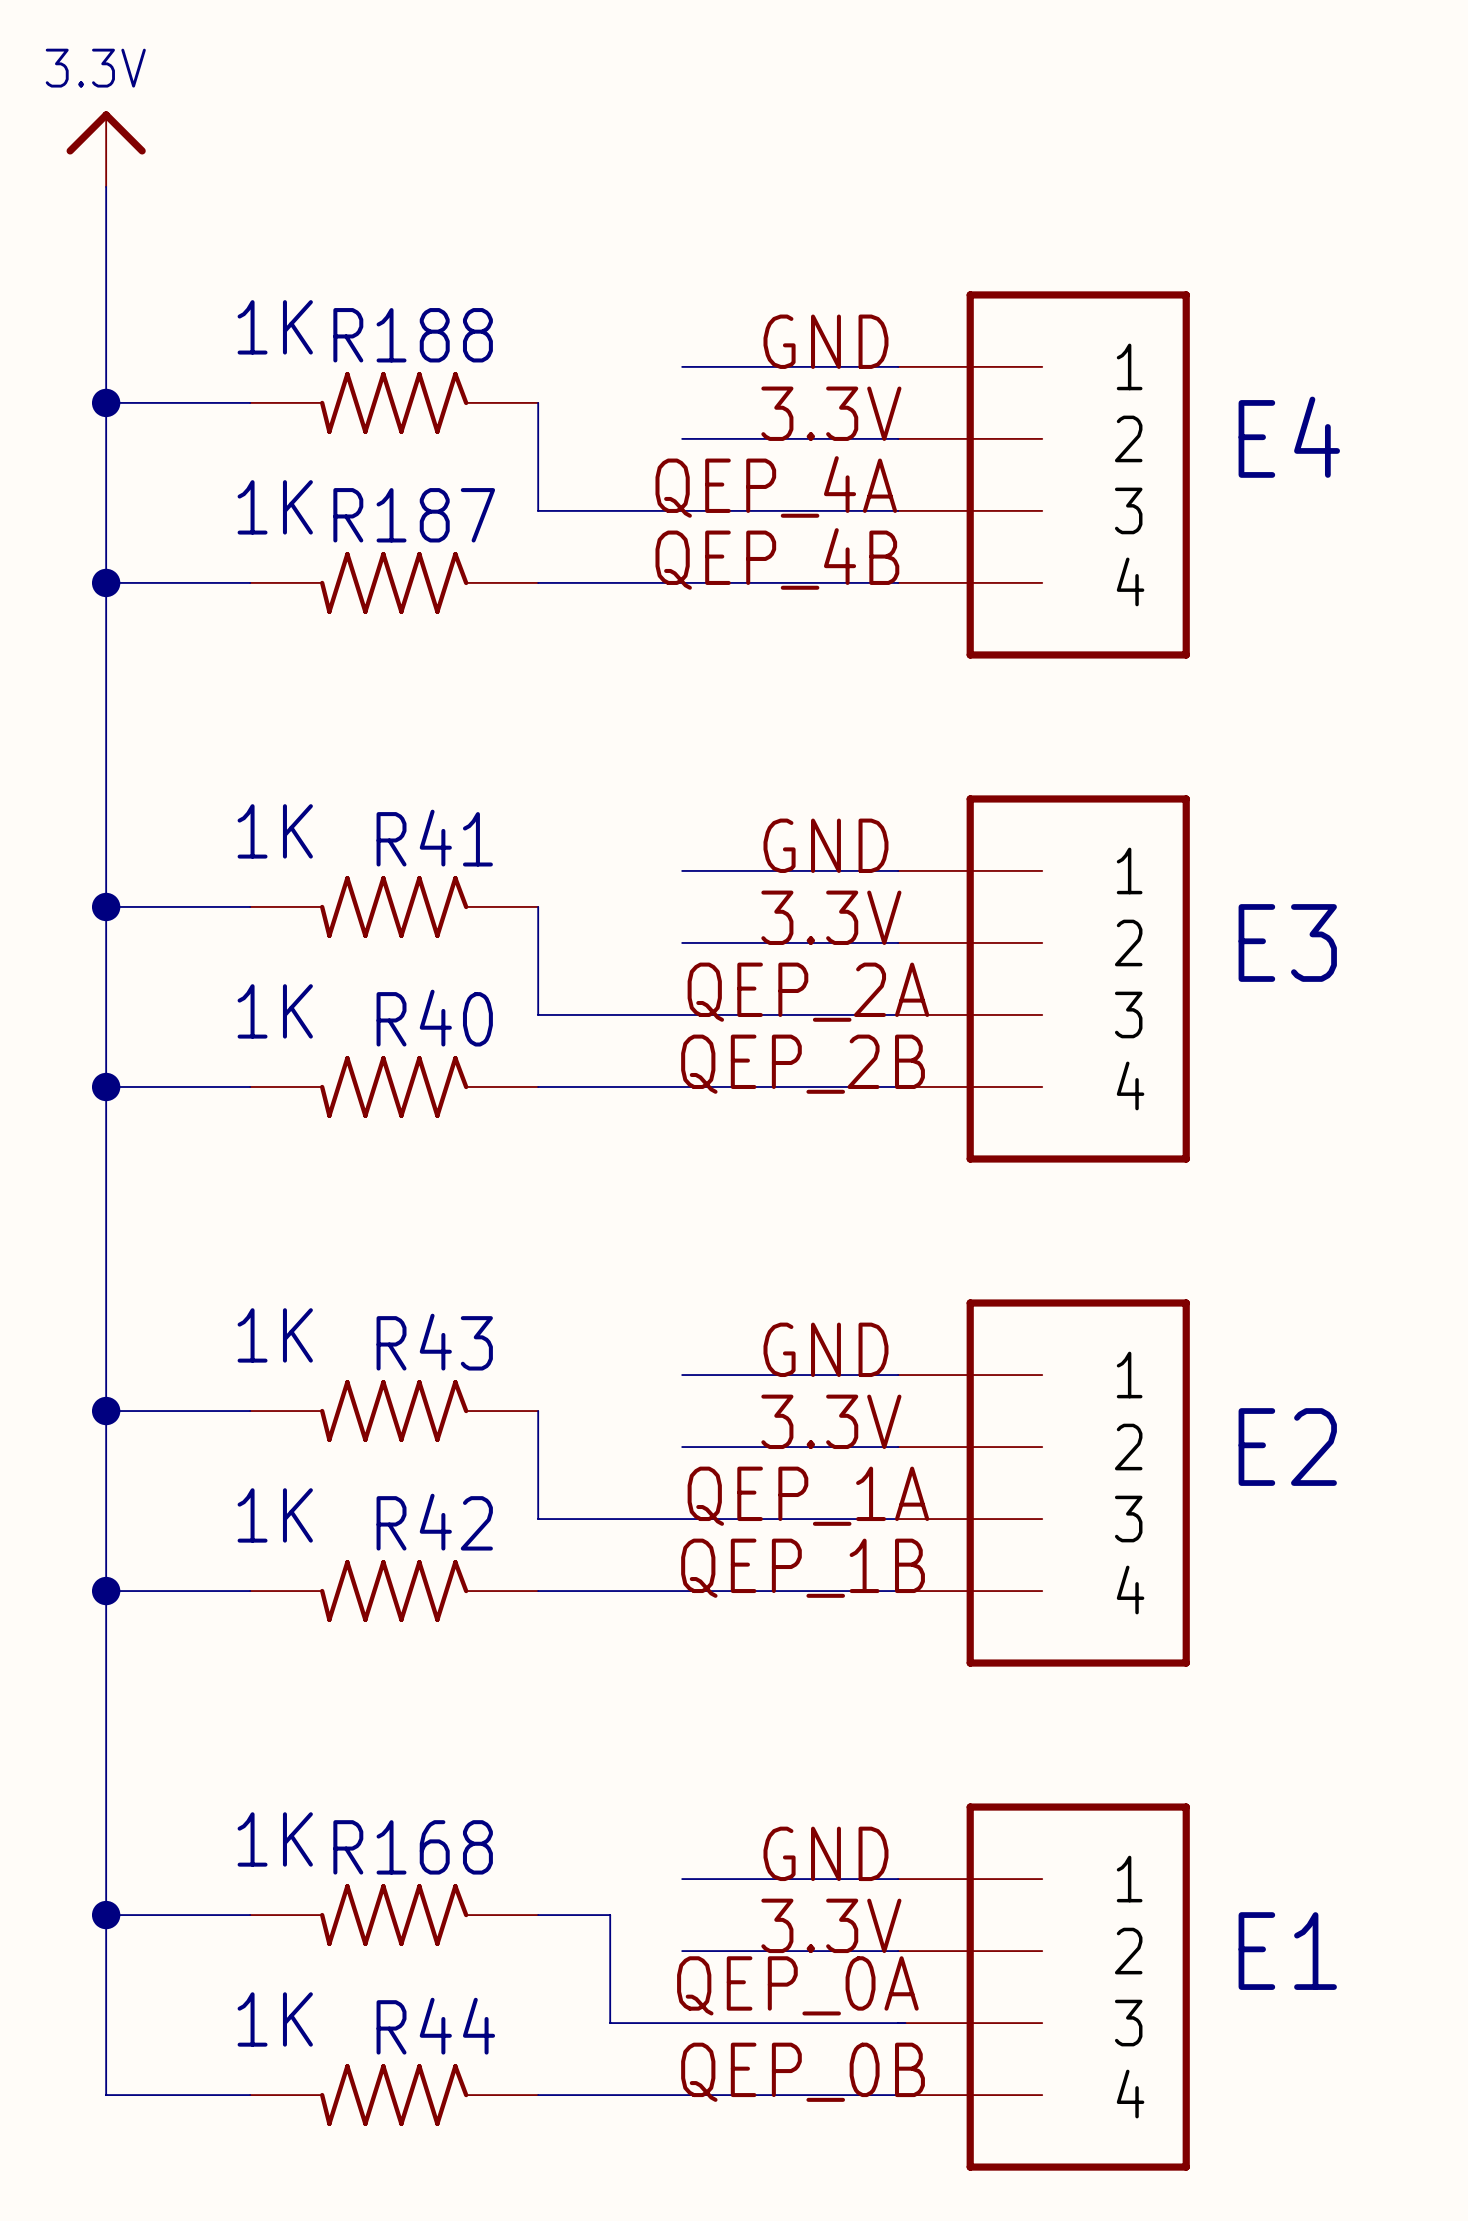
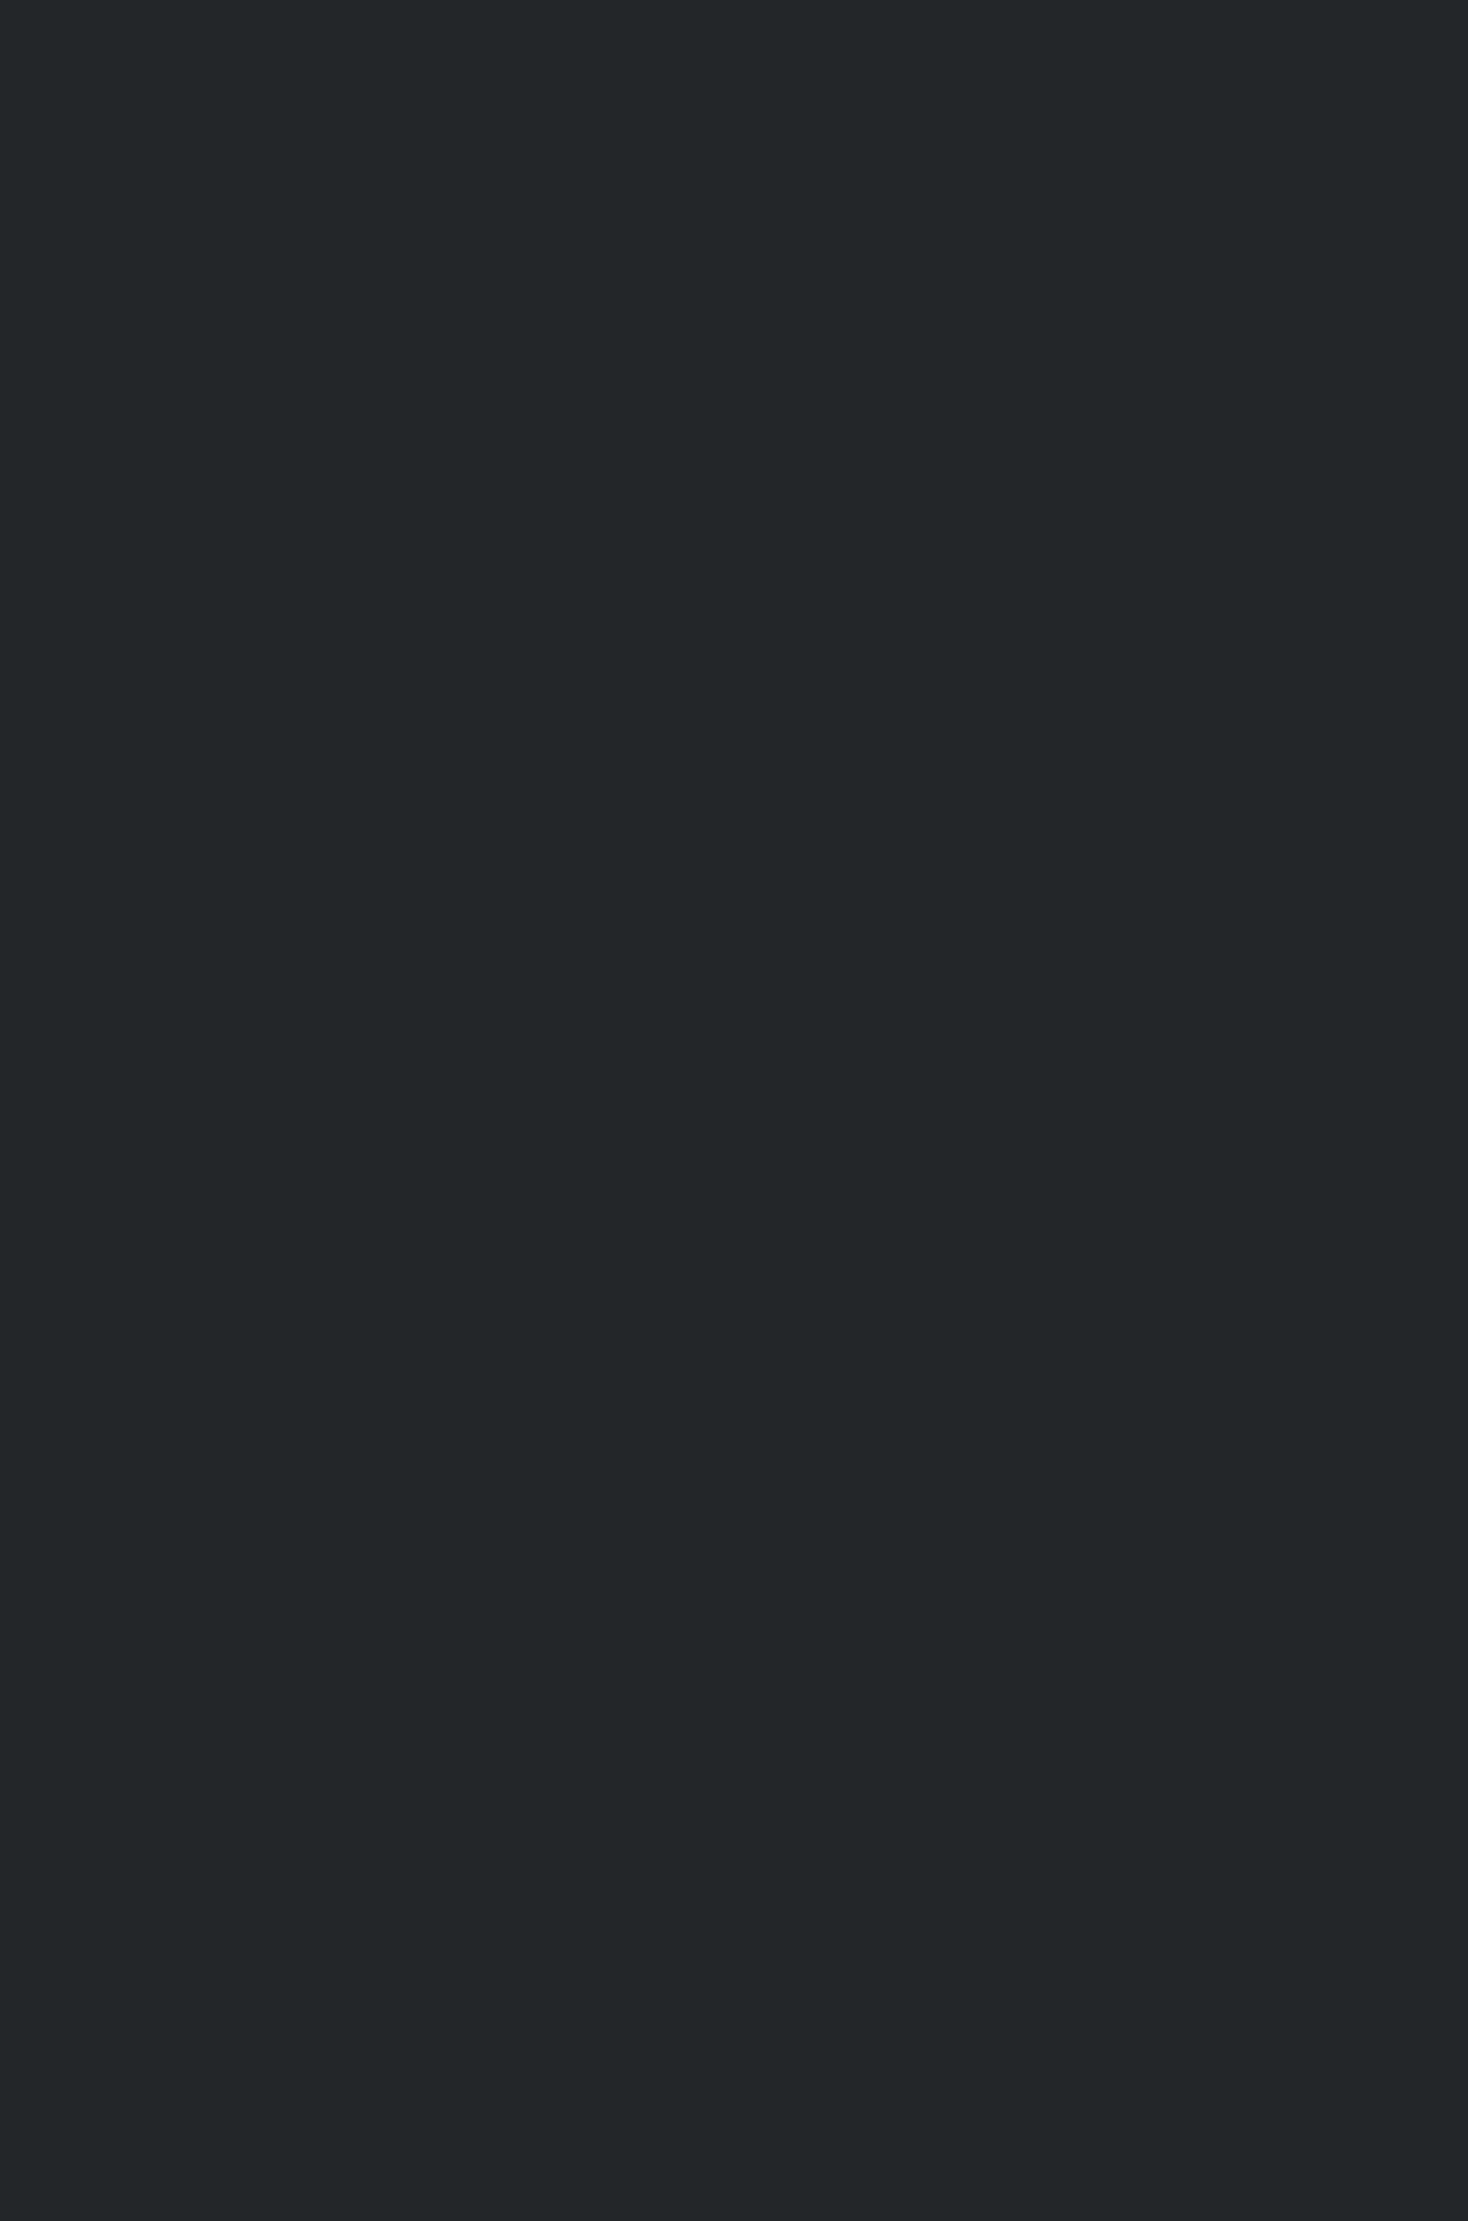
power symbol: 3.3V (106, 149) -> none
wire: (106, 186) (106, 2095) (250, 2095) -> none
label: GND (825, 341) -> none
wire: (682, 366) (898, 366) -> none
wire: (106, 402) (250, 402) -> none
junction: (106, 402) -> none
R188: 1K (394, 402) -> none
wire: (538, 402) (538, 510) (898, 510) -> none
label: 3.3V (831, 413) -> none
wire: (682, 438) (898, 438) -> none
E4: (1044, 474) -> none
label: QEP_4A (776, 486) -> none
label: QEP_4B (777, 558) -> none
wire: (106, 582) (250, 582) -> none
junction: (106, 582) -> none
R187: 1K (394, 582) -> none
wire: (538, 582) (898, 582) -> none
label: GND (825, 845) -> none
wire: (682, 870) (898, 870) -> none
wire: (106, 906) (250, 906) -> none
junction: (106, 906) -> none
R41: 1K (394, 906) -> none
wire: (538, 906) (538, 1014) (898, 1014) -> none
label: 3.3V (831, 917) -> none
wire: (682, 942) (898, 942) -> none
E3: (1044, 978) -> none
label: QEP_2A (808, 992) -> none
label: QEP_2B (803, 1064) -> none
wire: (106, 1086) (250, 1086) -> none
junction: (106, 1086) -> none
R40: 1K (394, 1086) -> none
wire: (538, 1086) (898, 1086) -> none
label: GND (825, 1349) -> none
wire: (682, 1375) (898, 1375) -> none
wire: (106, 1411) (250, 1411) -> none
junction: (106, 1411) -> none
R43: 1K (394, 1411) -> none
wire: (538, 1411) (538, 1519) (898, 1519) -> none
label: 3.3V (831, 1421) -> none
wire: (682, 1447) (898, 1447) -> none
E2: (1044, 1483) -> none
label: QEP_1A (808, 1496) -> none
label: QEP_1B (803, 1568) -> none
wire: (106, 1591) (250, 1591) -> none
junction: (106, 1591) -> none
R42: 1K (394, 1591) -> none
wire: (538, 1591) (898, 1591) -> none
label: GND (825, 1853) -> none
wire: (682, 1879) (898, 1879) -> none
wire: (106, 1915) (250, 1915) -> none
junction: (106, 1915) -> none
R168: 1K (394, 1915) -> none
wire: (538, 1915) (610, 1915) (610, 2023) (905, 2023) -> none
label: 3.3V (831, 1925) -> none
wire: (682, 1951) (898, 1951) -> none
label: QEP_0A (797, 1985) -> none
E1: (1044, 1987) -> none
label: QEP_0B (803, 2072) -> none
R44: 1K (394, 2095) -> none
wire: (538, 2095) (898, 2095) -> none

